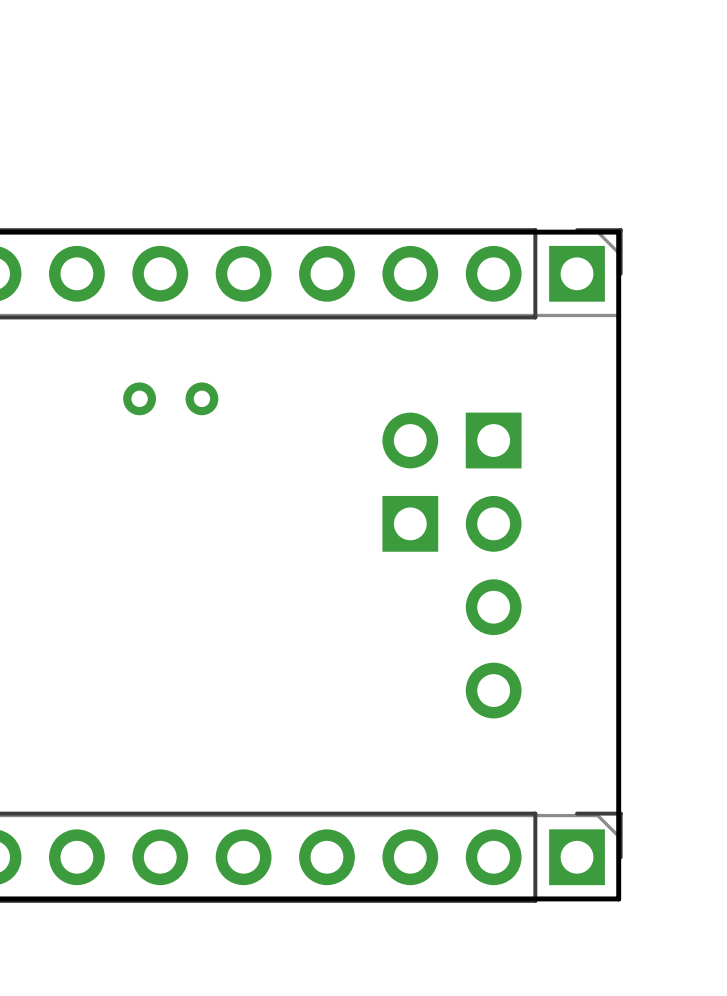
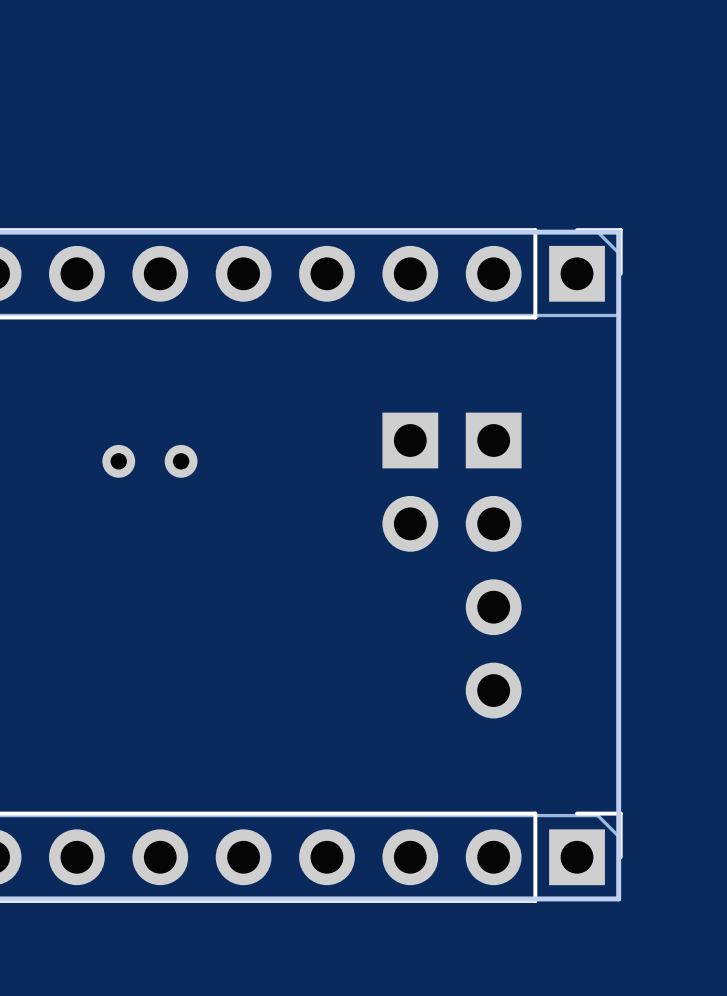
part position: (170, 398) -> (149, 461)
part rotation: 0° (410, 482) -> 180° (410, 482)

